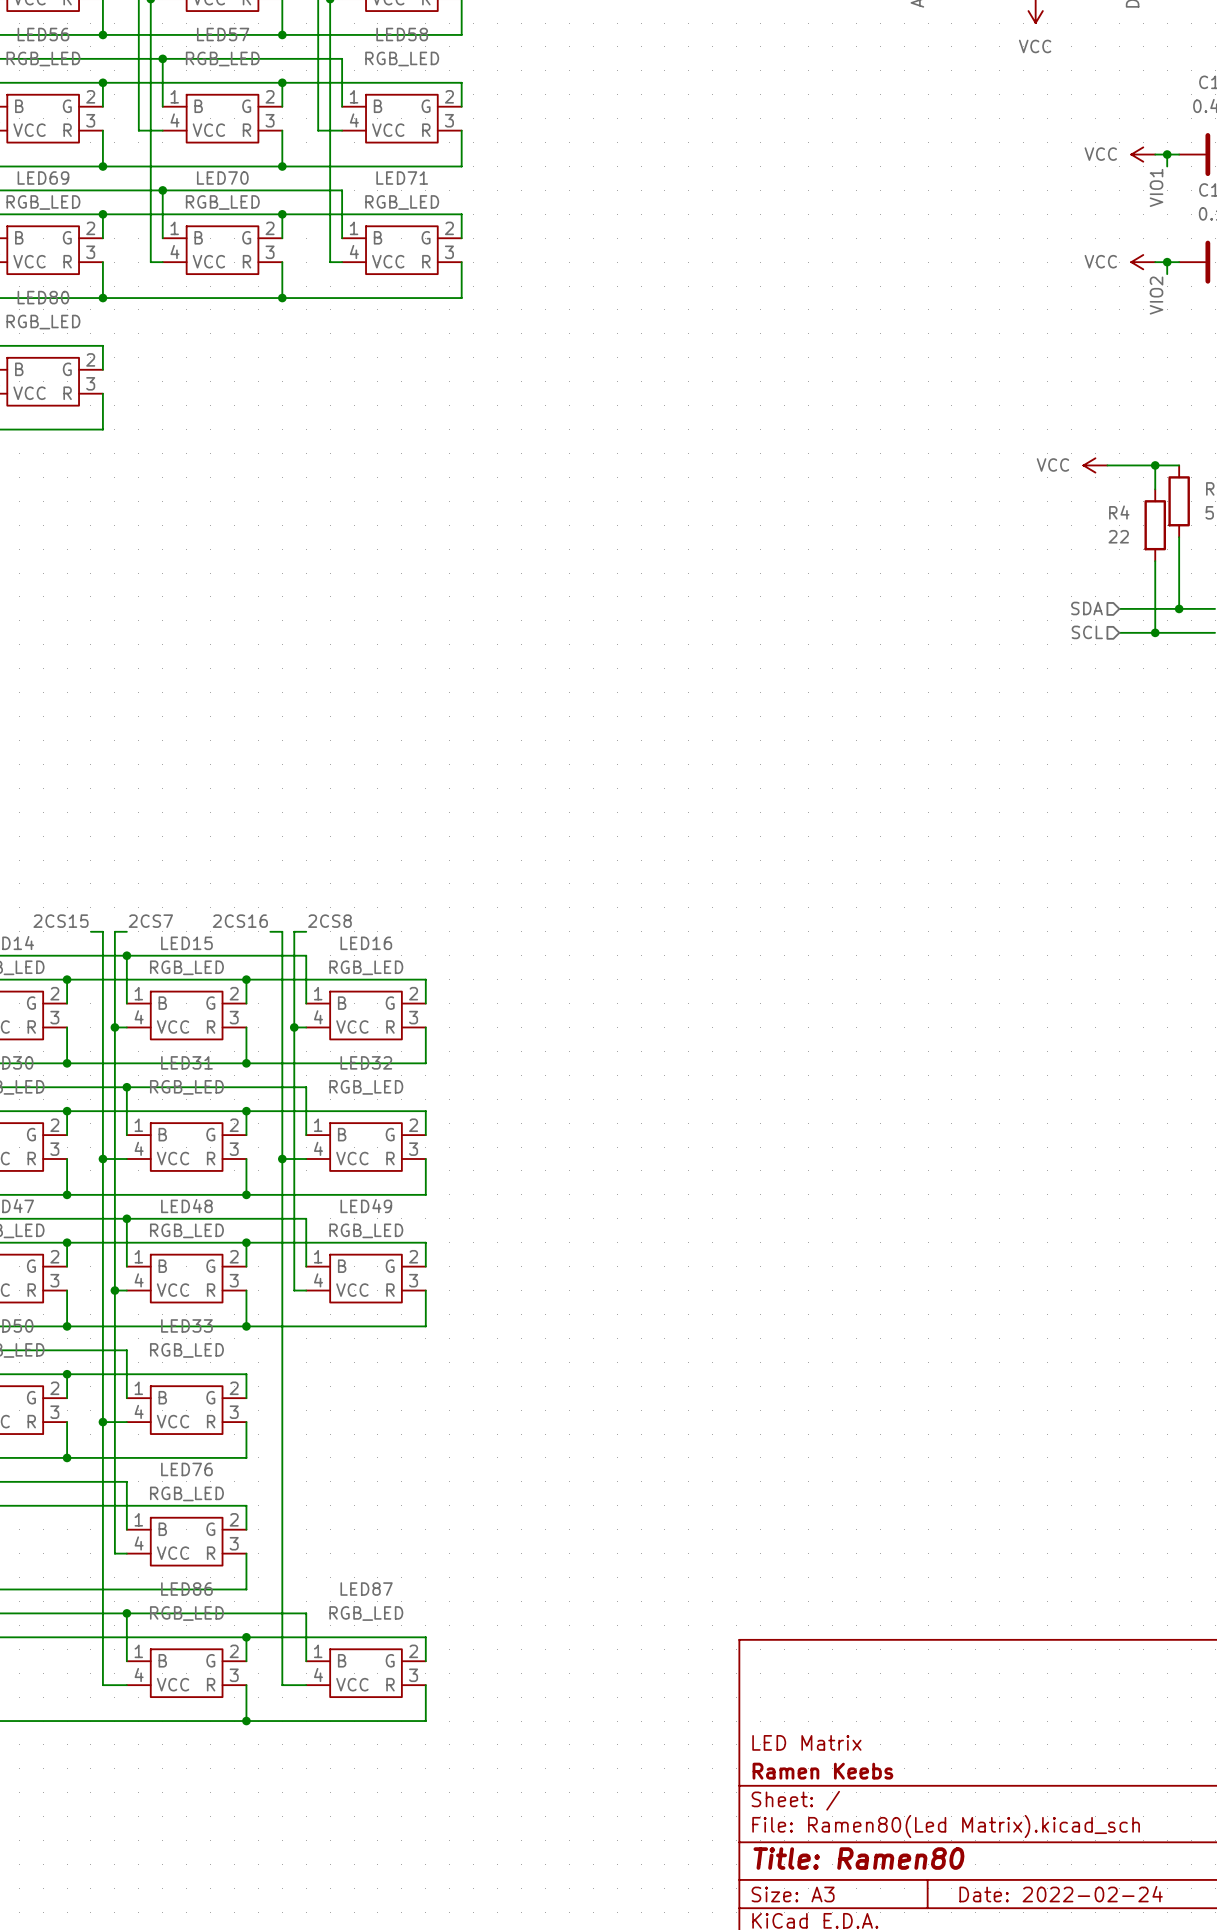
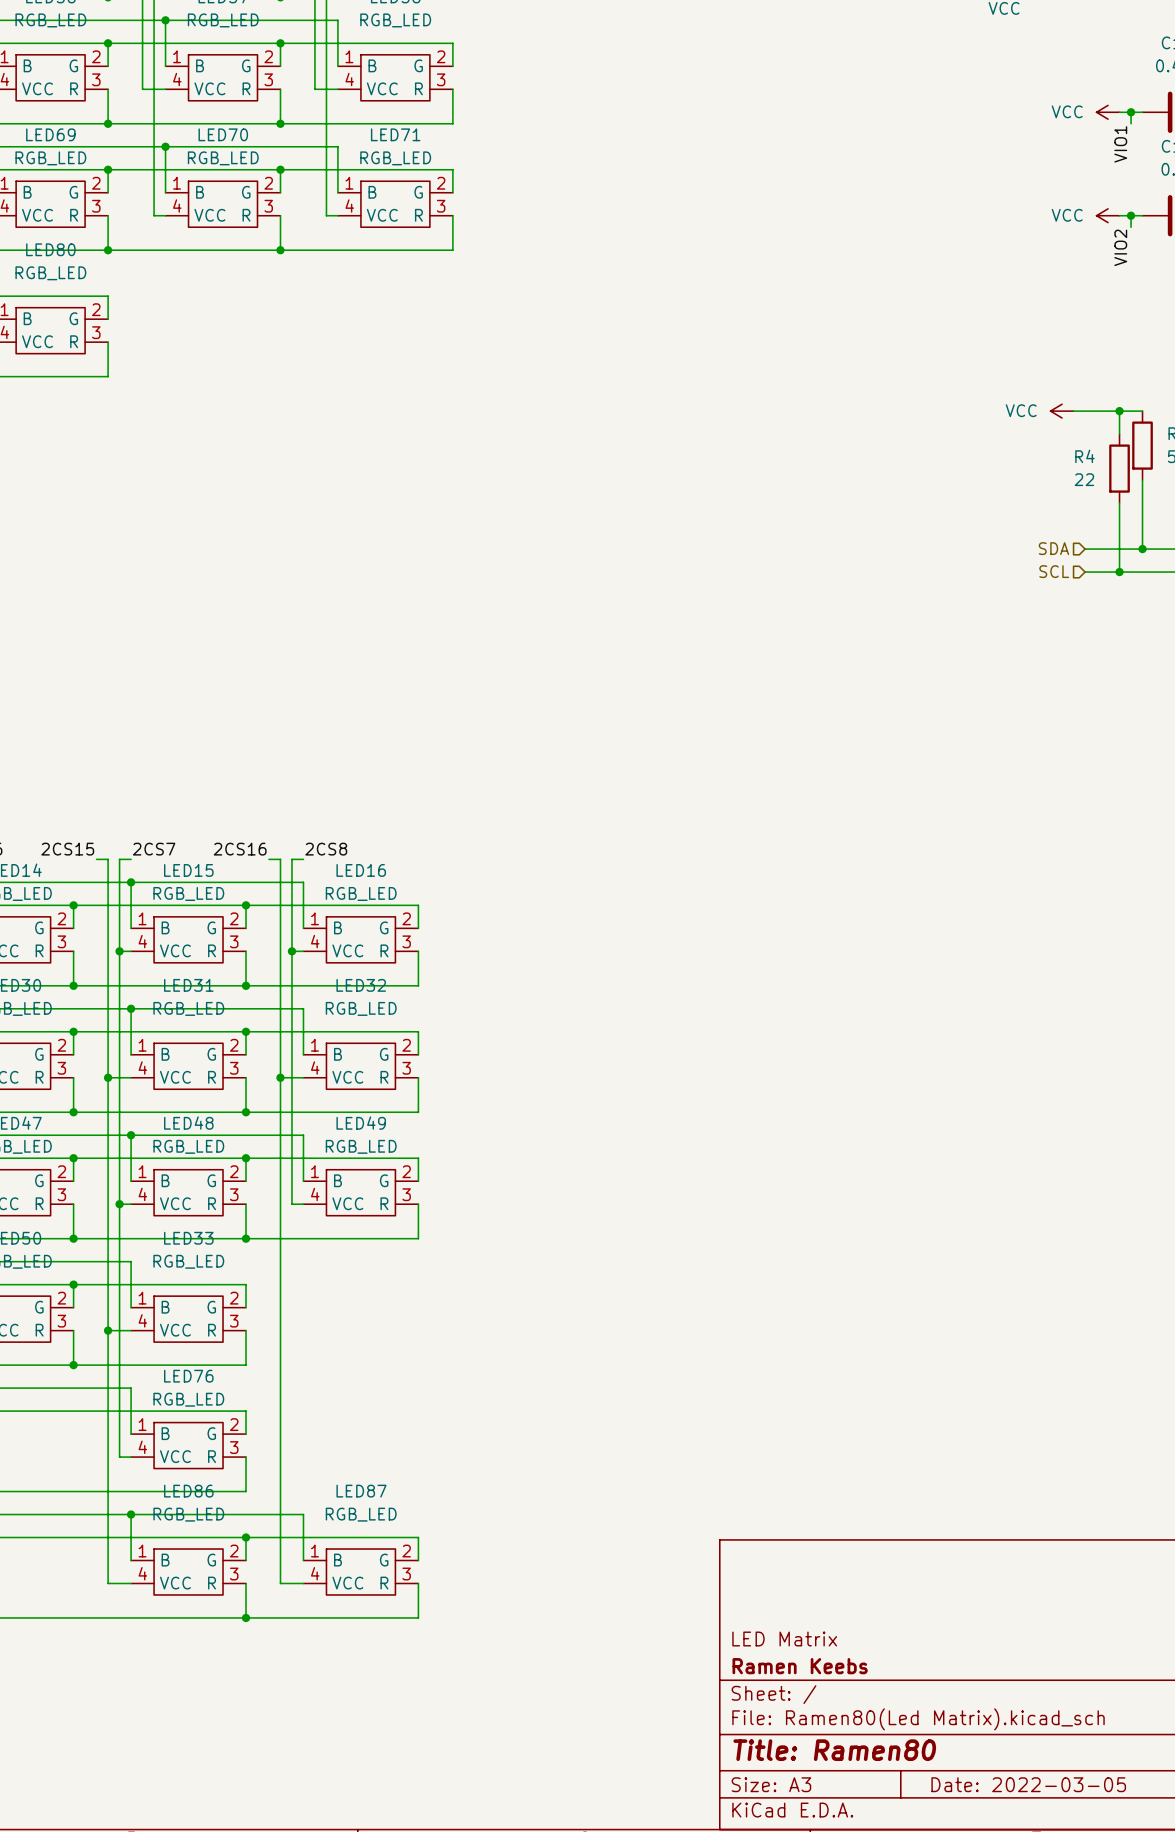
title block: Date: 2022-02-24 (1061, 1894) -> Date: 2022-03-05 (1028, 1784)

